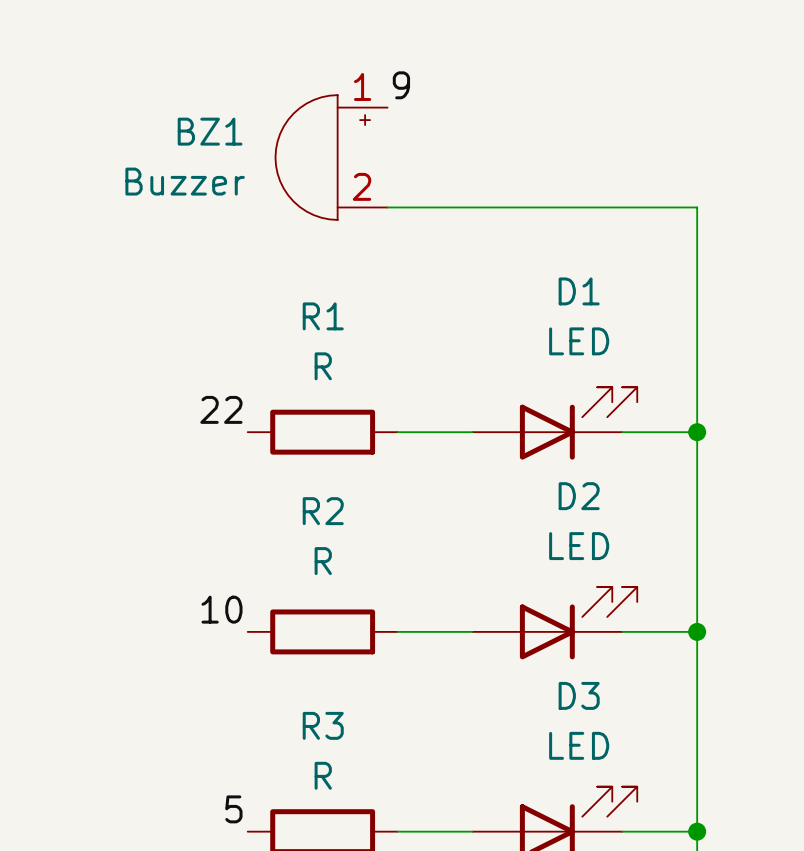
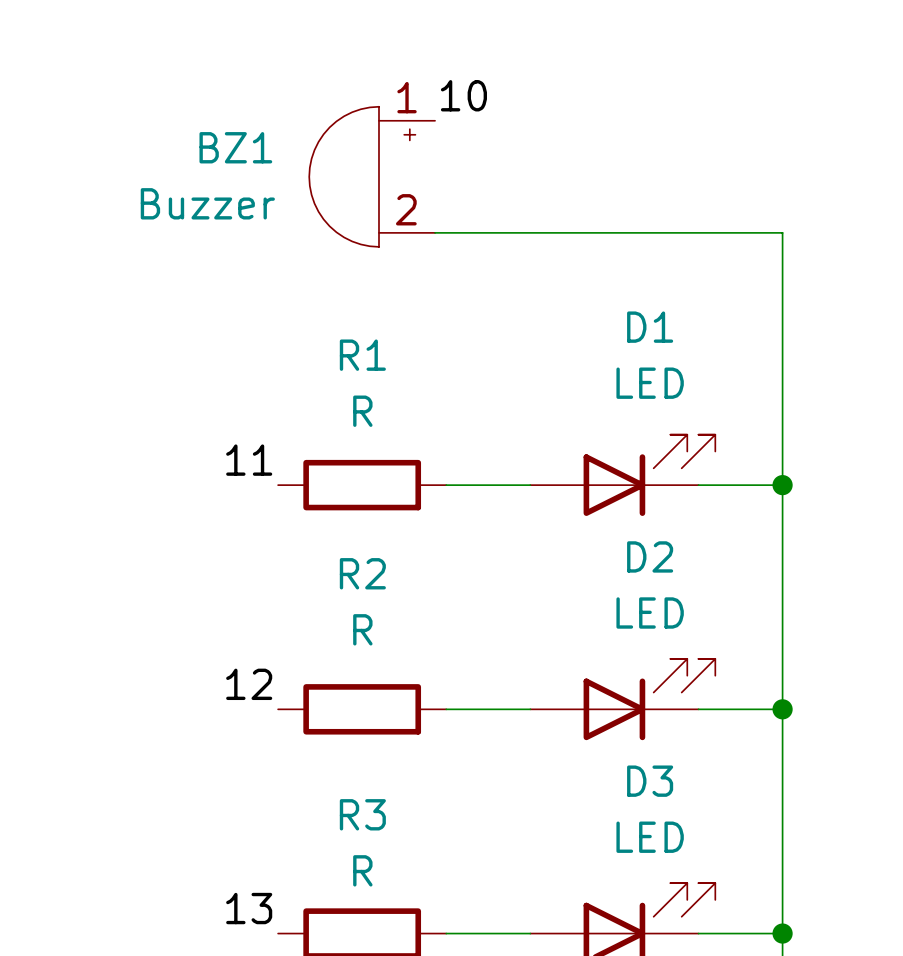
label: 9 (401, 85) -> 10 (463, 95)
label: 22 (221, 409) -> 11 (249, 460)
label: 10 (221, 609) -> 12 (249, 684)
label: 5 (233, 809) -> 13 (249, 908)

